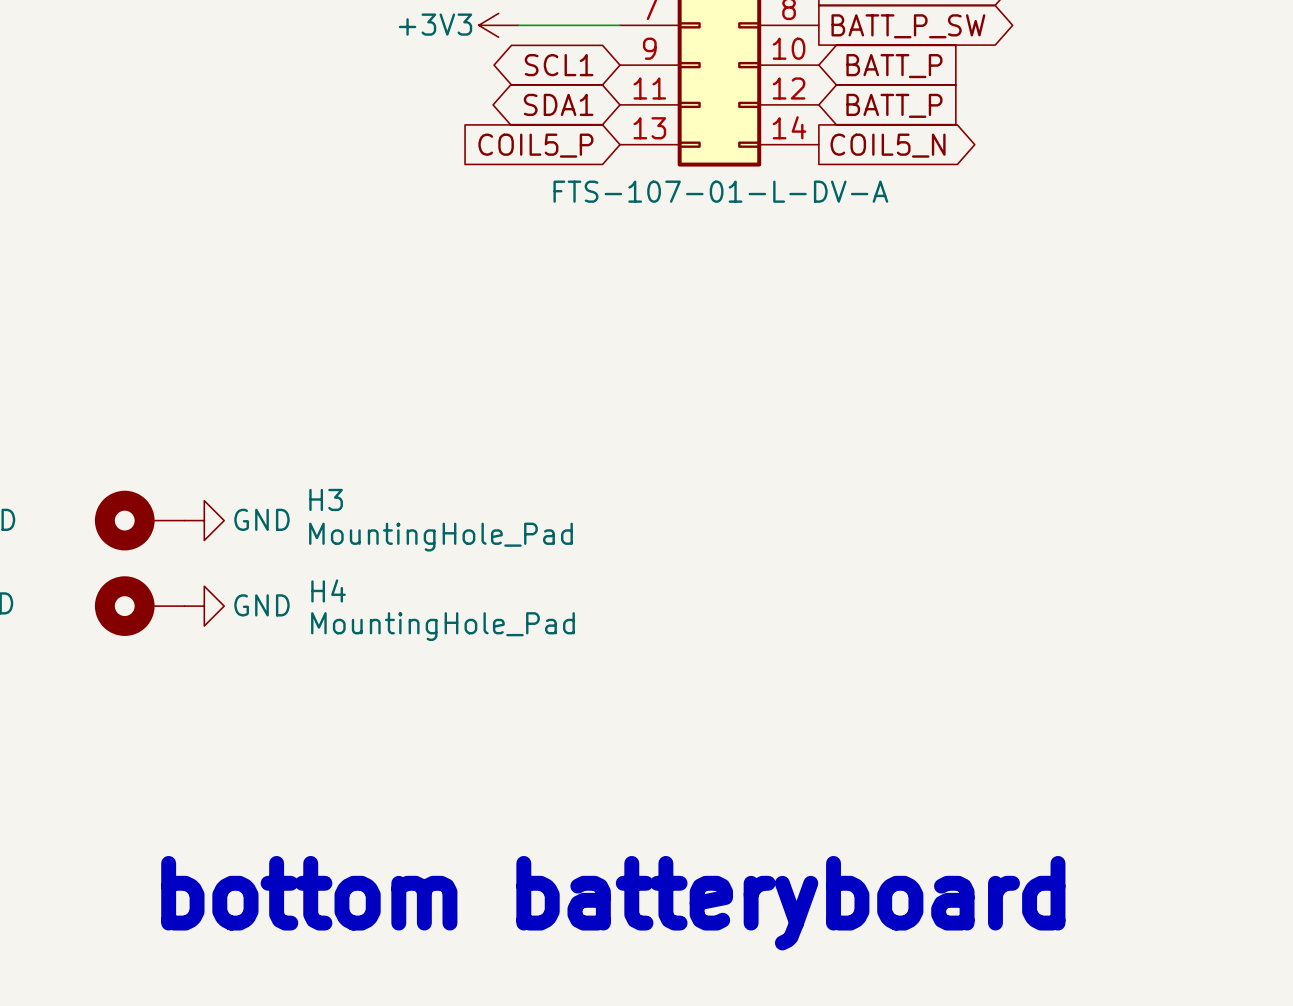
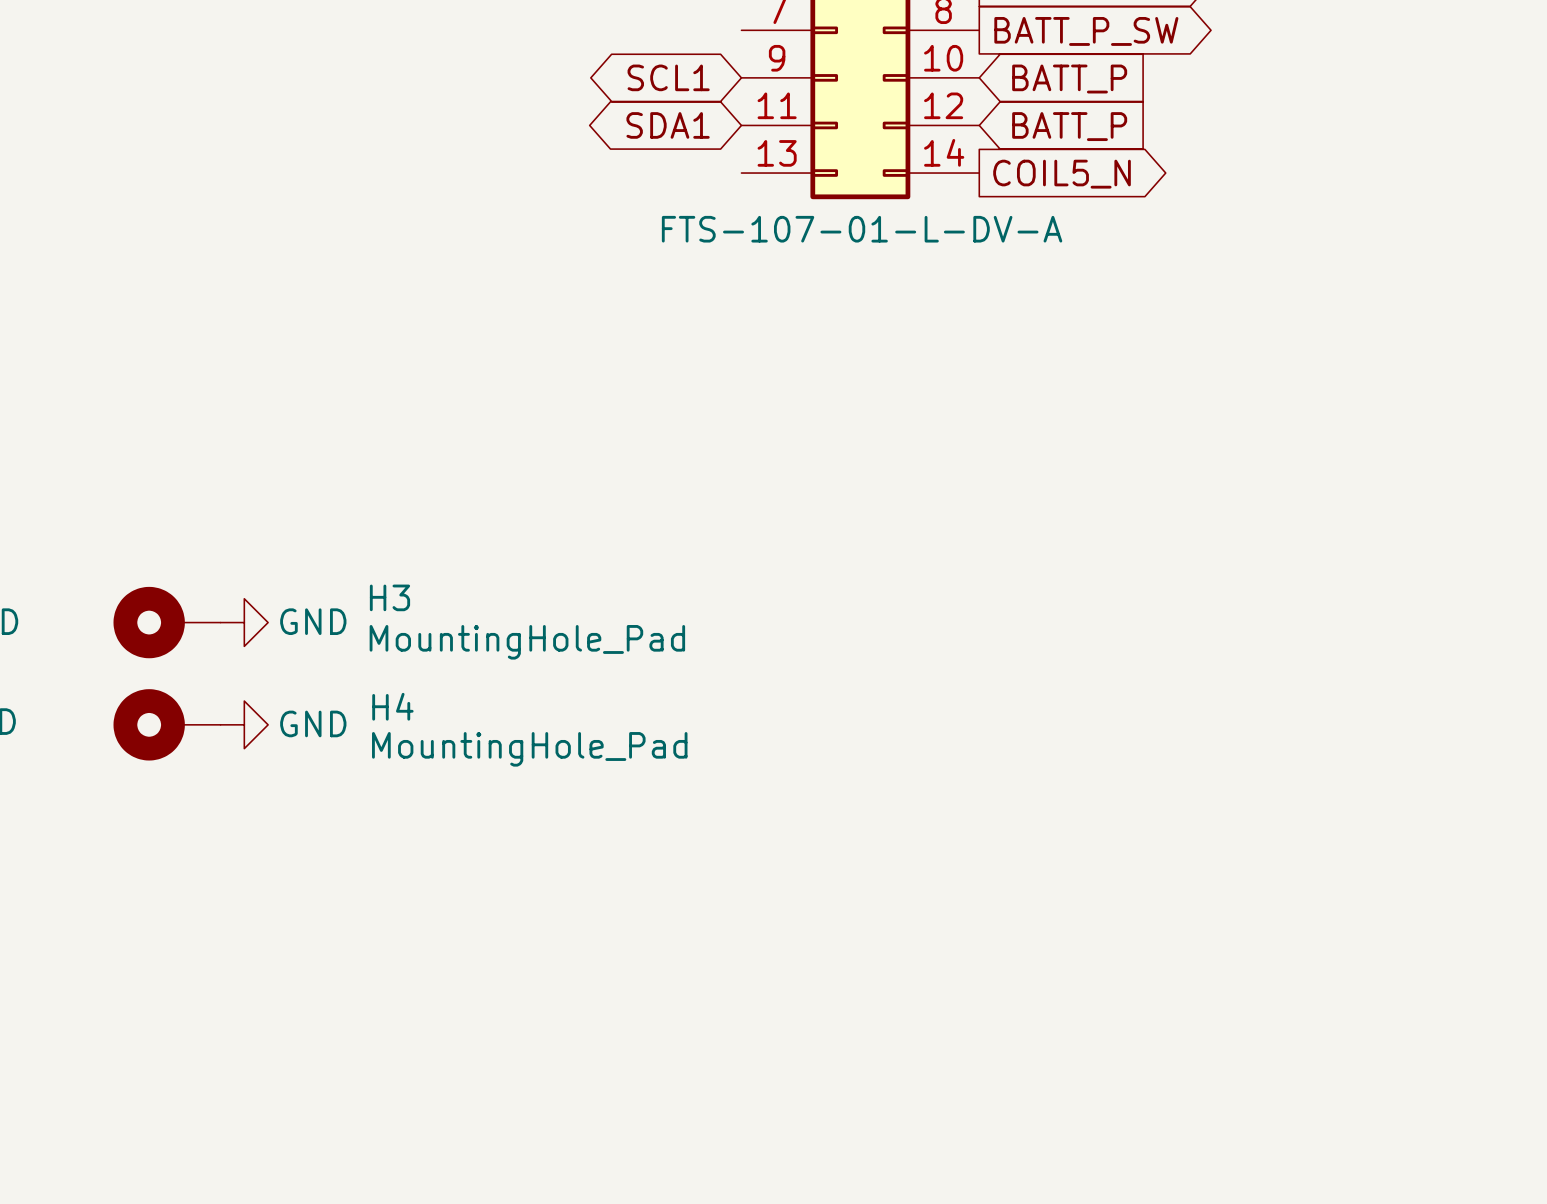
power symbol: +3V3 (498, 25) -> none
wire: (518, 25) (619, 25) -> none
global label: COIL5_P (535, 145) -> none
text: bottom batteryboard (613, 903) -> none

